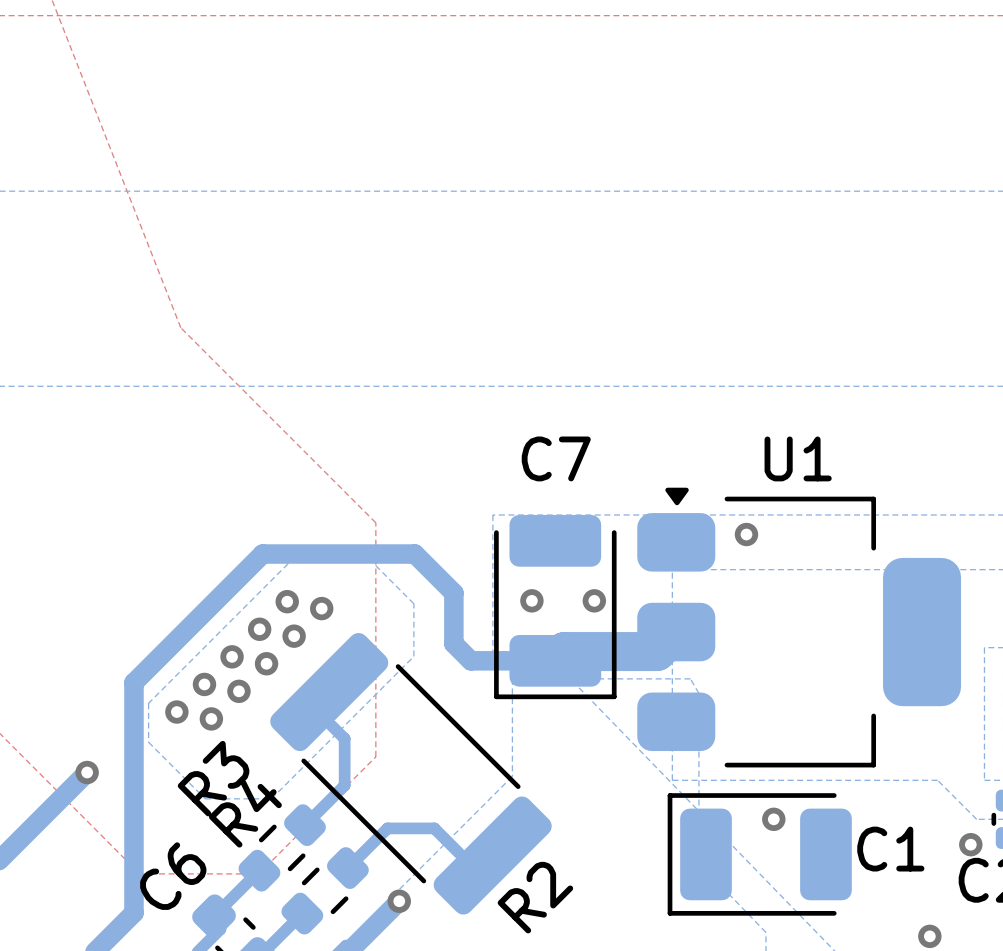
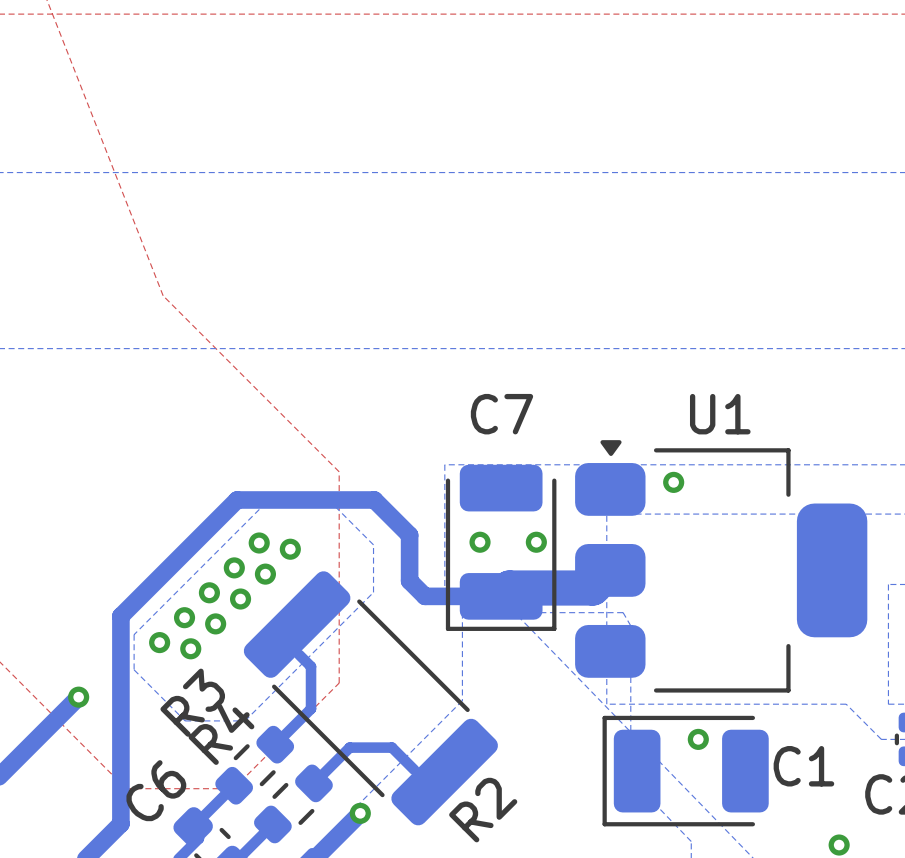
via: (970, 844) -> none

